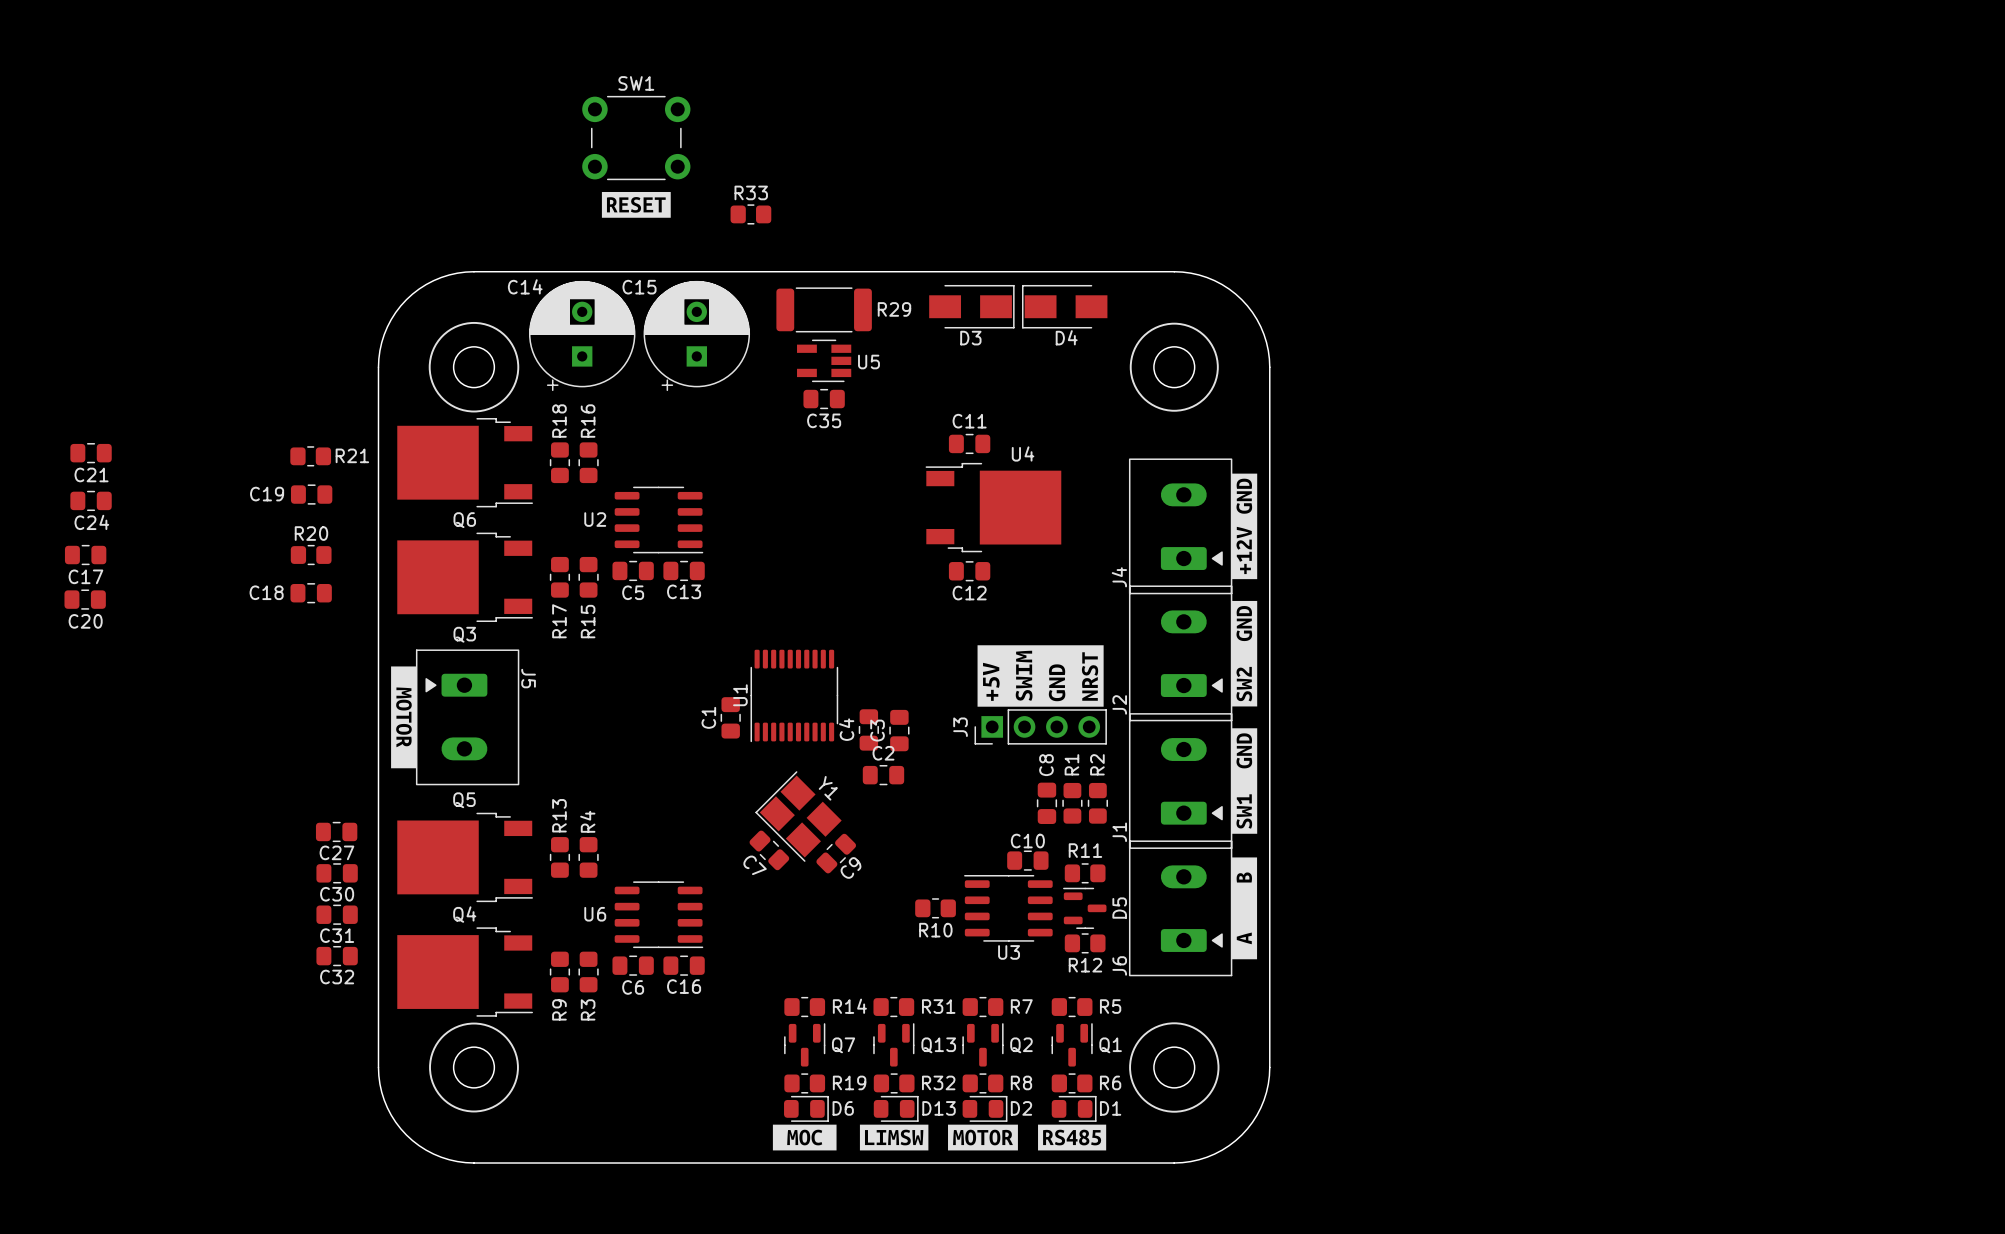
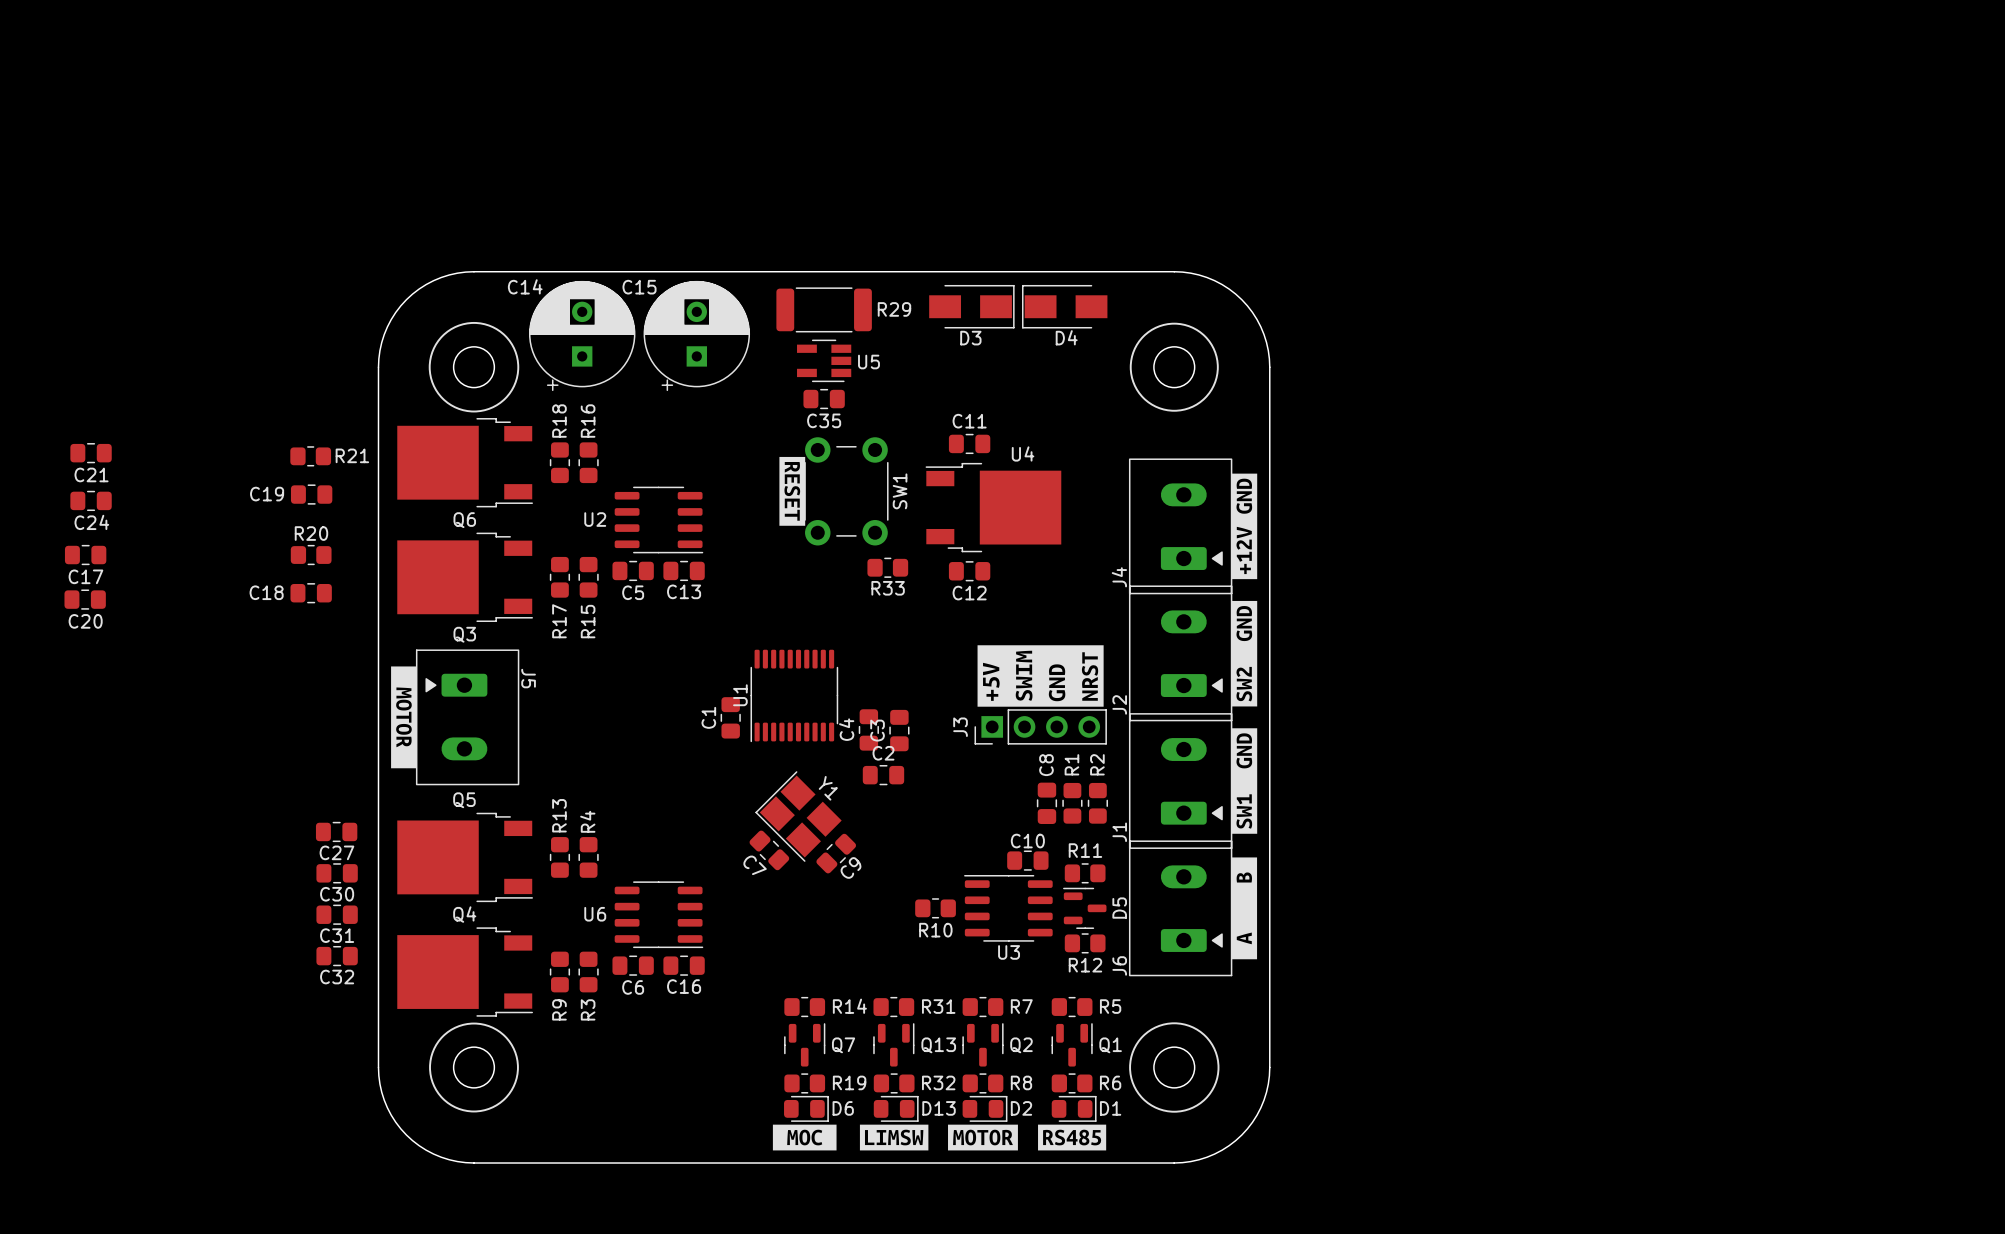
SW1 rotation: 0° (636, 138) -> 90° clockwise (846, 491)
SW1 position: (636, 138) -> (846, 491)
drawing: [601, 191, 671, 218] -> none
R33 name position: R33 (751, 192) -> R33 (888, 588)
R33 position: (750, 214) -> (887, 567)
drawing: none -> [779, 456, 806, 526]

